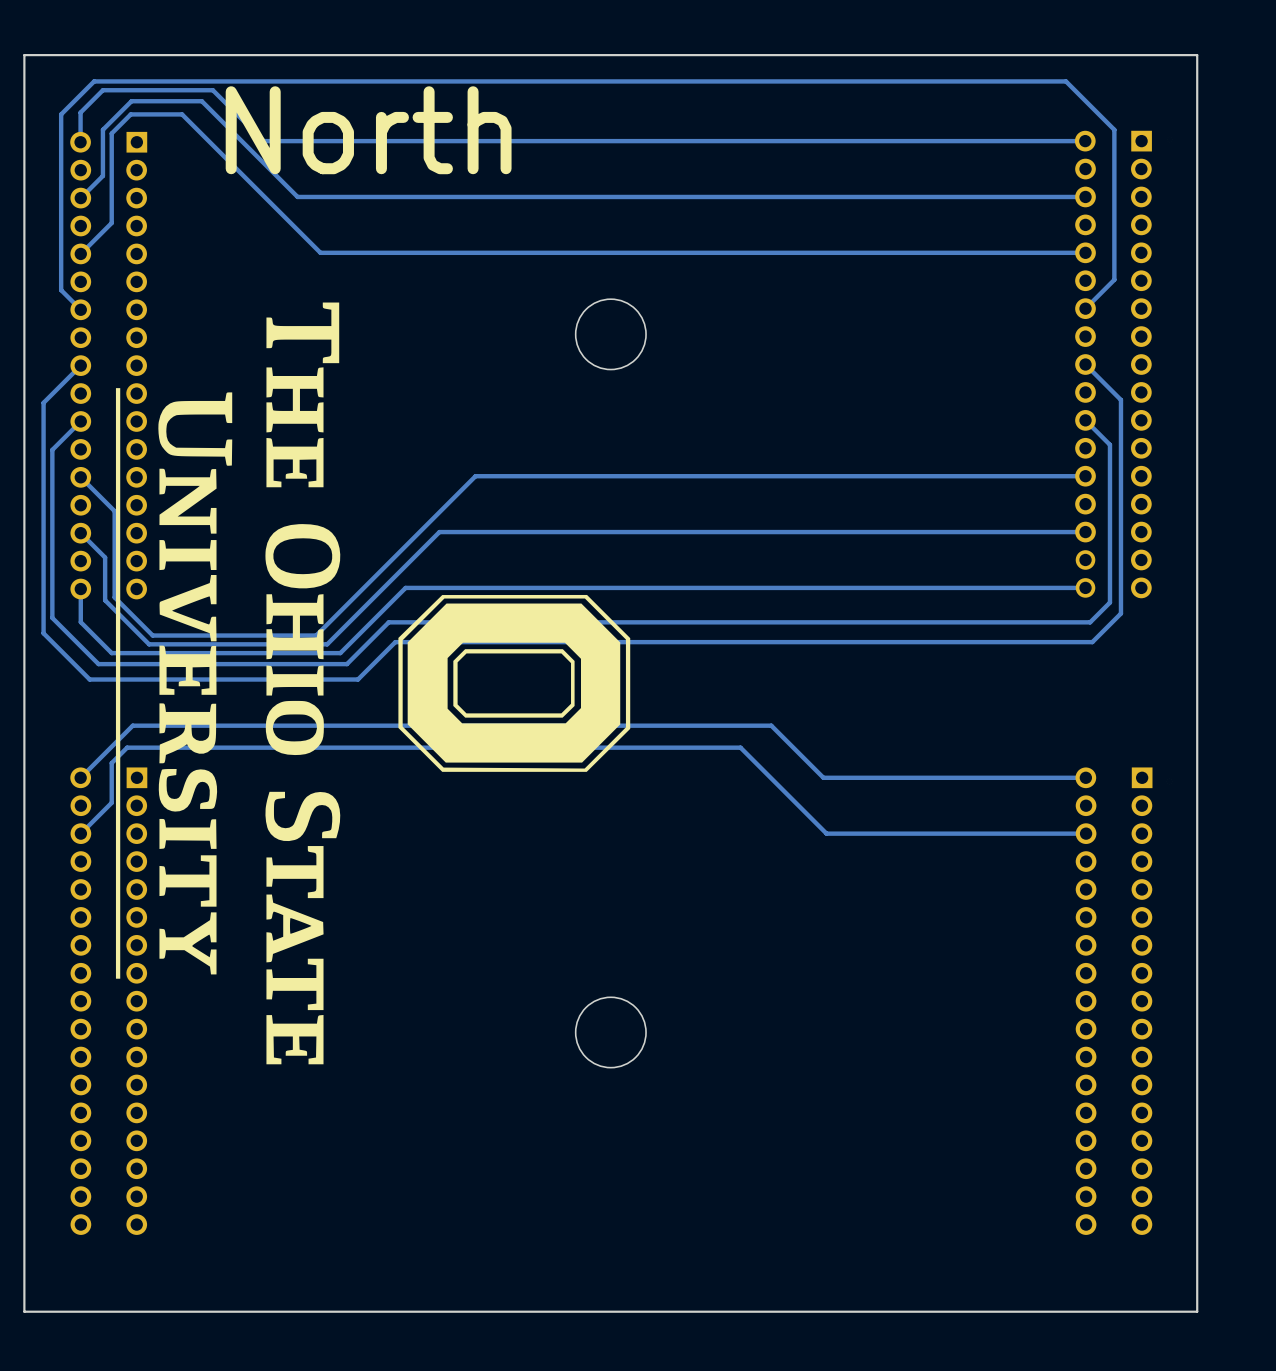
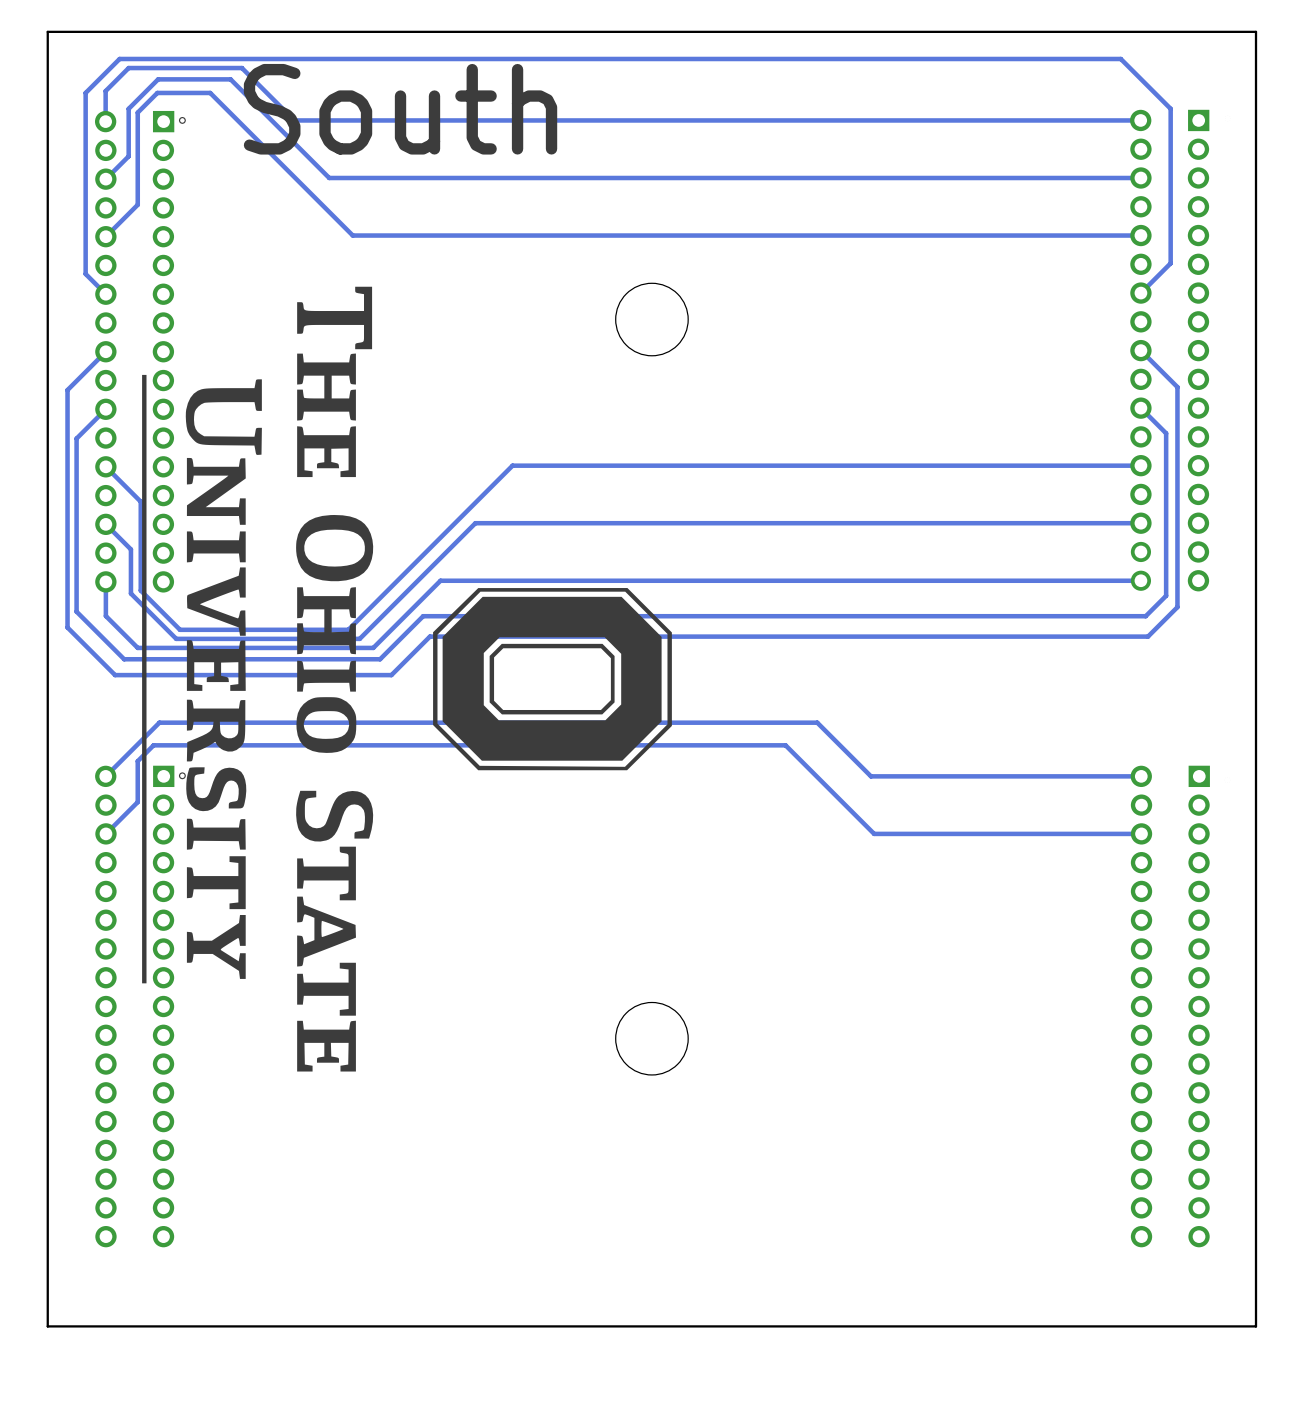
text: North (368, 130) -> South (400, 109)
drawing: none -> [178, 116, 186, 124]
drawing: none -> [178, 772, 186, 780]

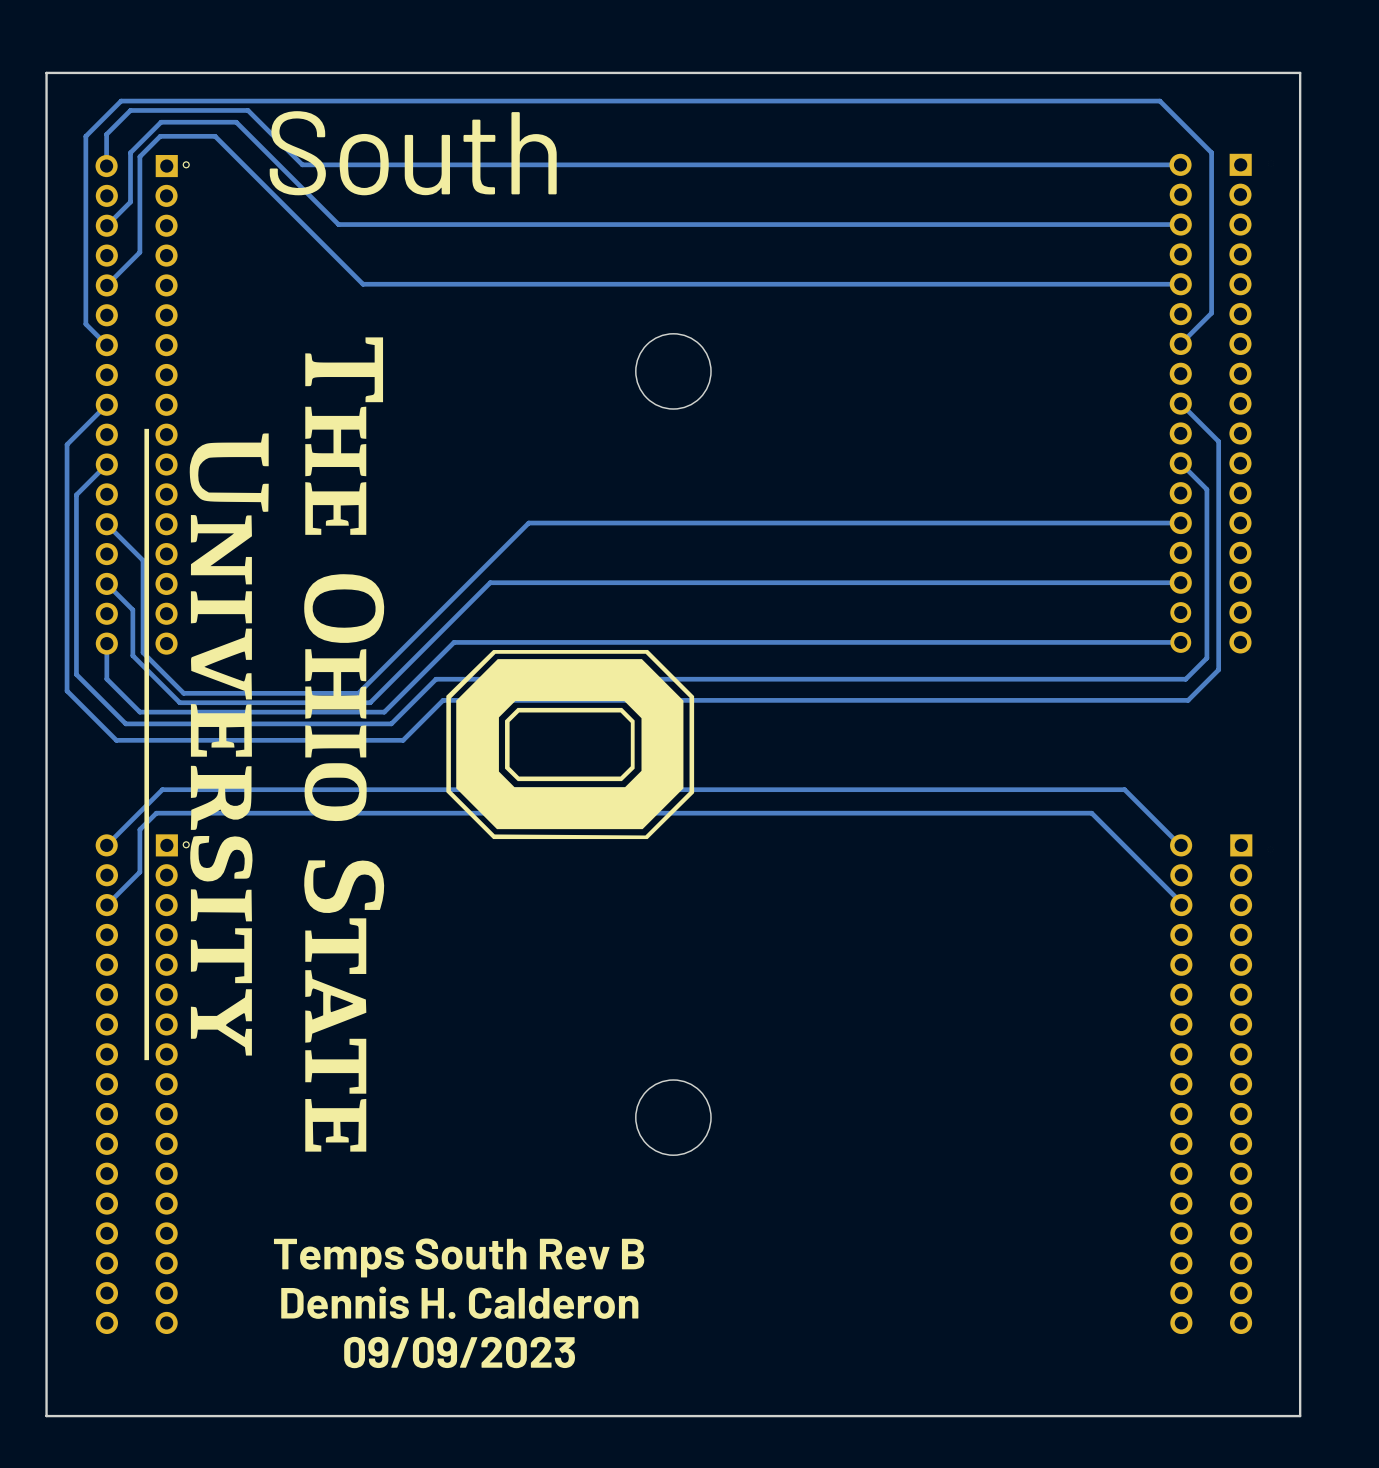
track: (817, 722) (870, 776) (1140, 776) -> (844, 789) (1124, 789) (1180, 845)
track: (785, 745) (874, 833) (1141, 833) -> (812, 813) (1091, 813) (1181, 902) (1181, 905)
text: none -> Temps South Rev B (459, 1257)
text: none -> Dennis H. Calderon (459, 1302)
text: none -> 09/09/2023 (459, 1352)

